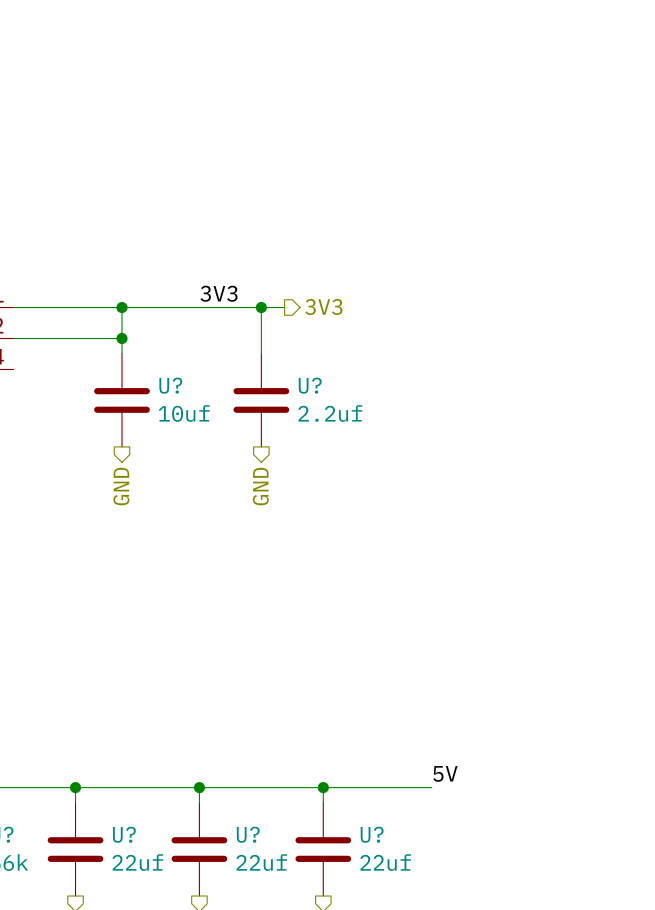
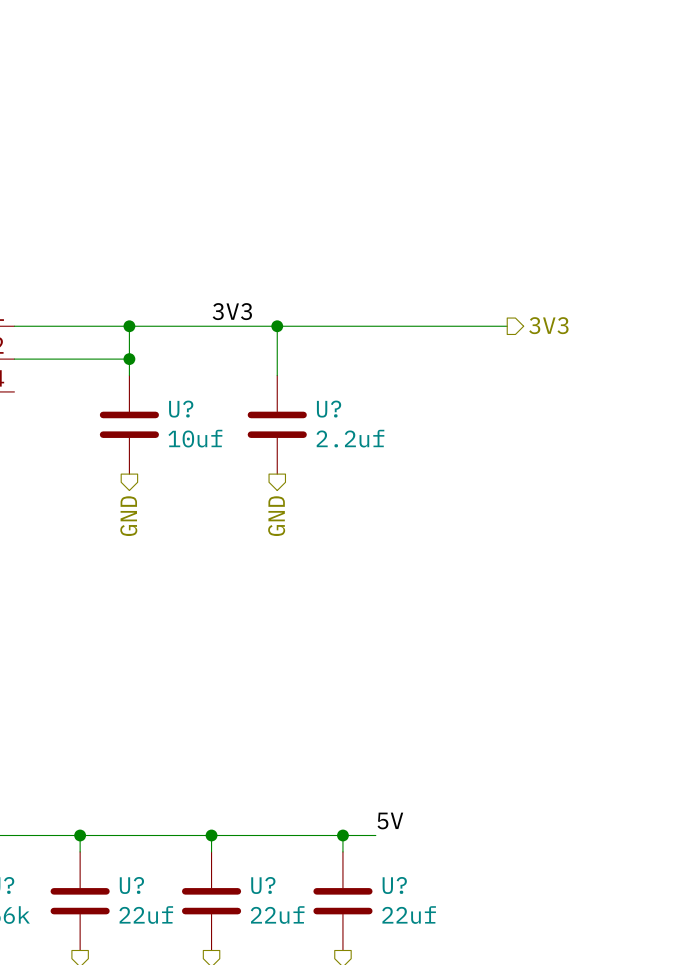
hierarchical label position: 3V3 (323, 306) -> 3V3 (548, 325)
wire: none -> (301, 326) (507, 326)
label position: 5V (445, 773) -> 5V (390, 820)
wire: (354, 787) (431, 787) -> none

